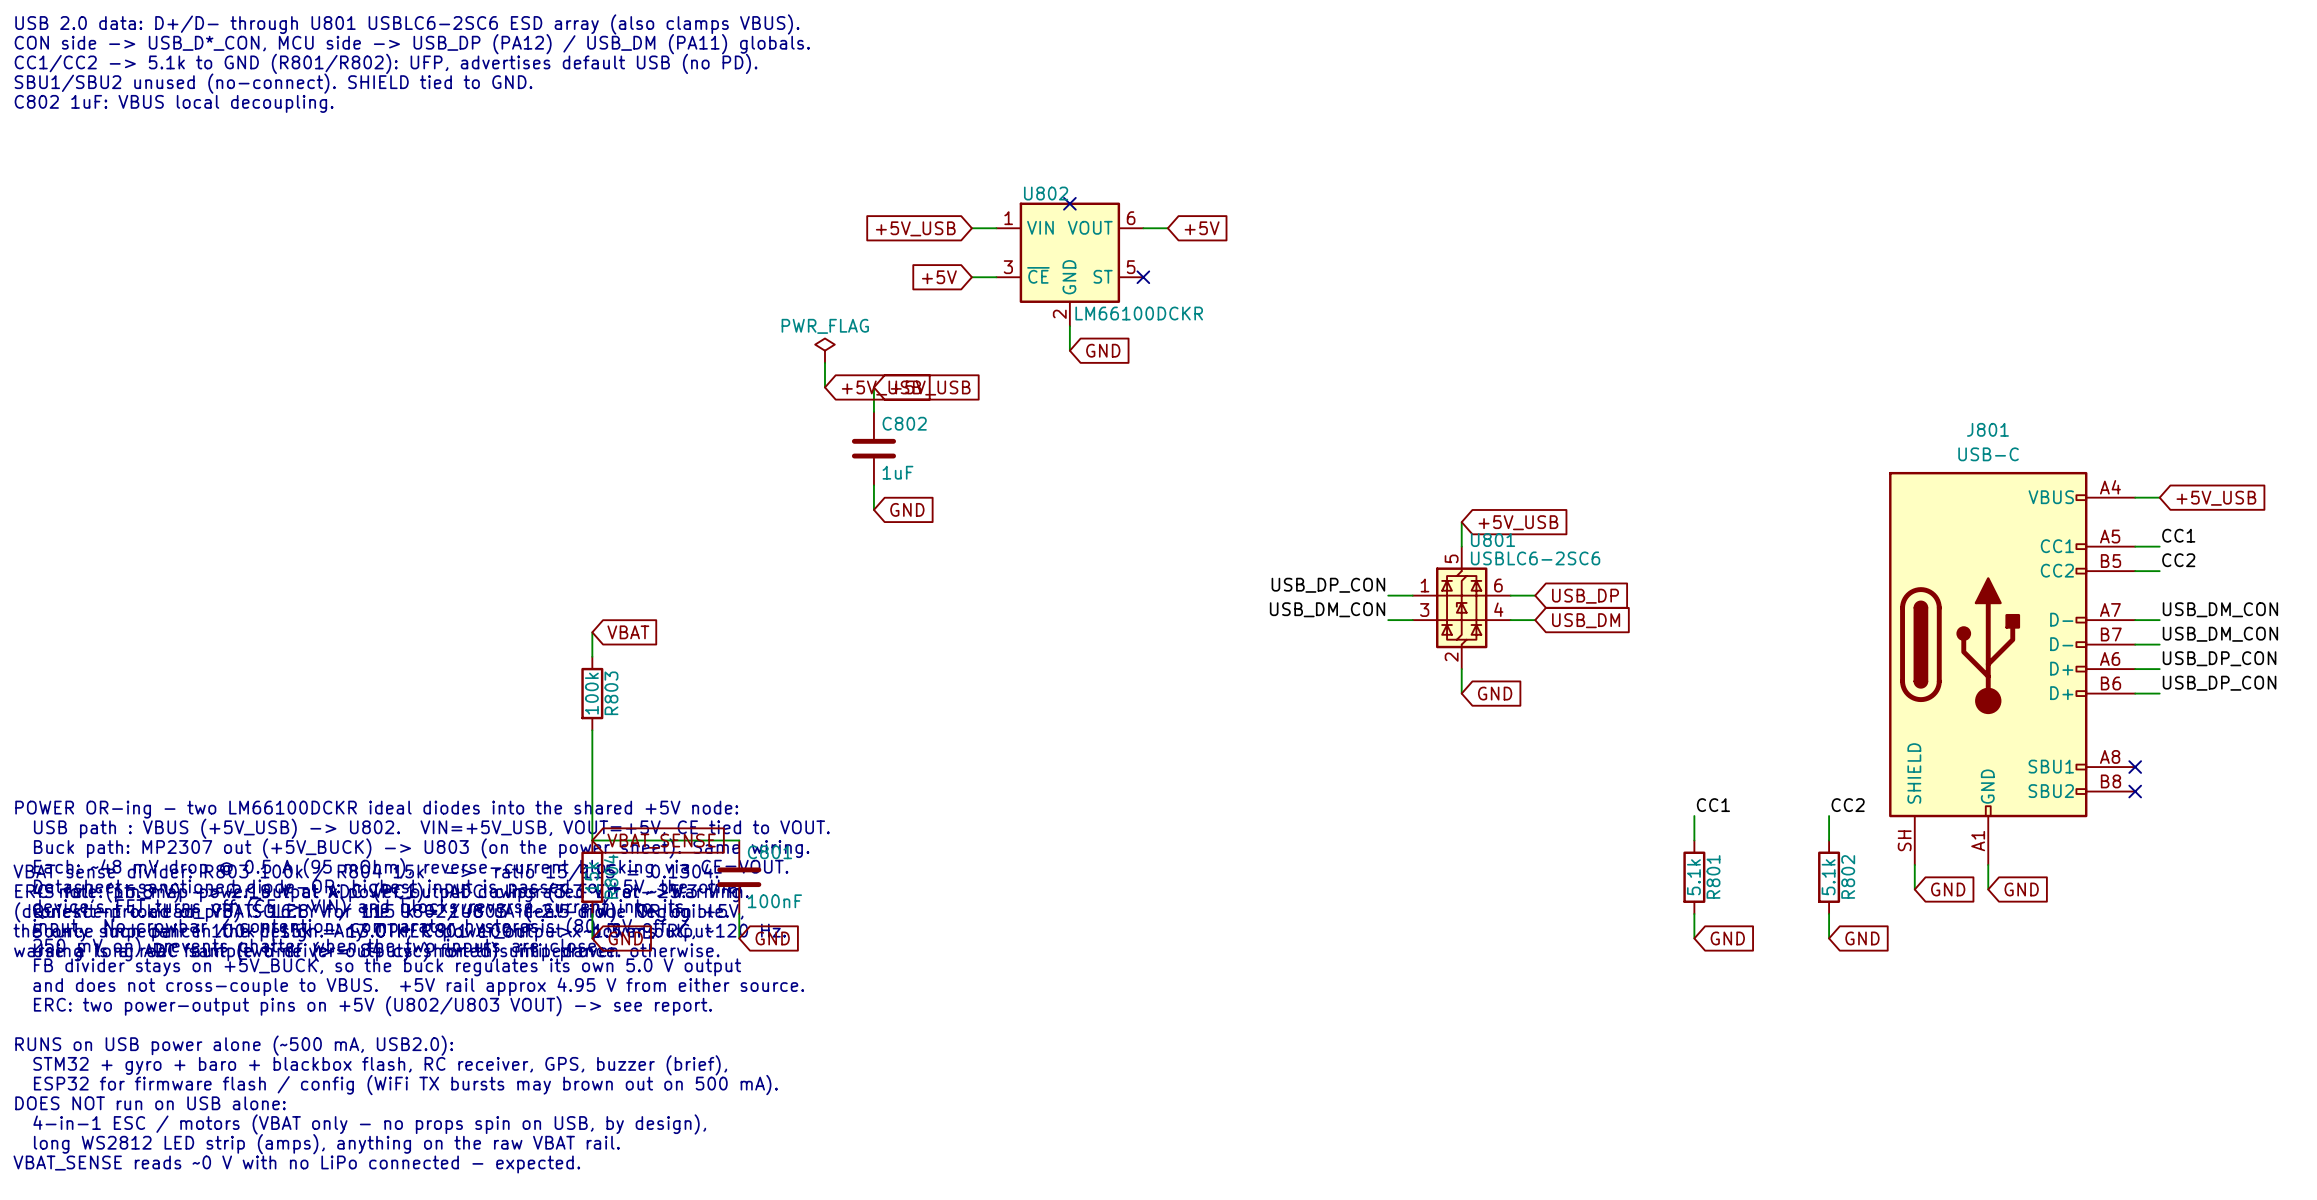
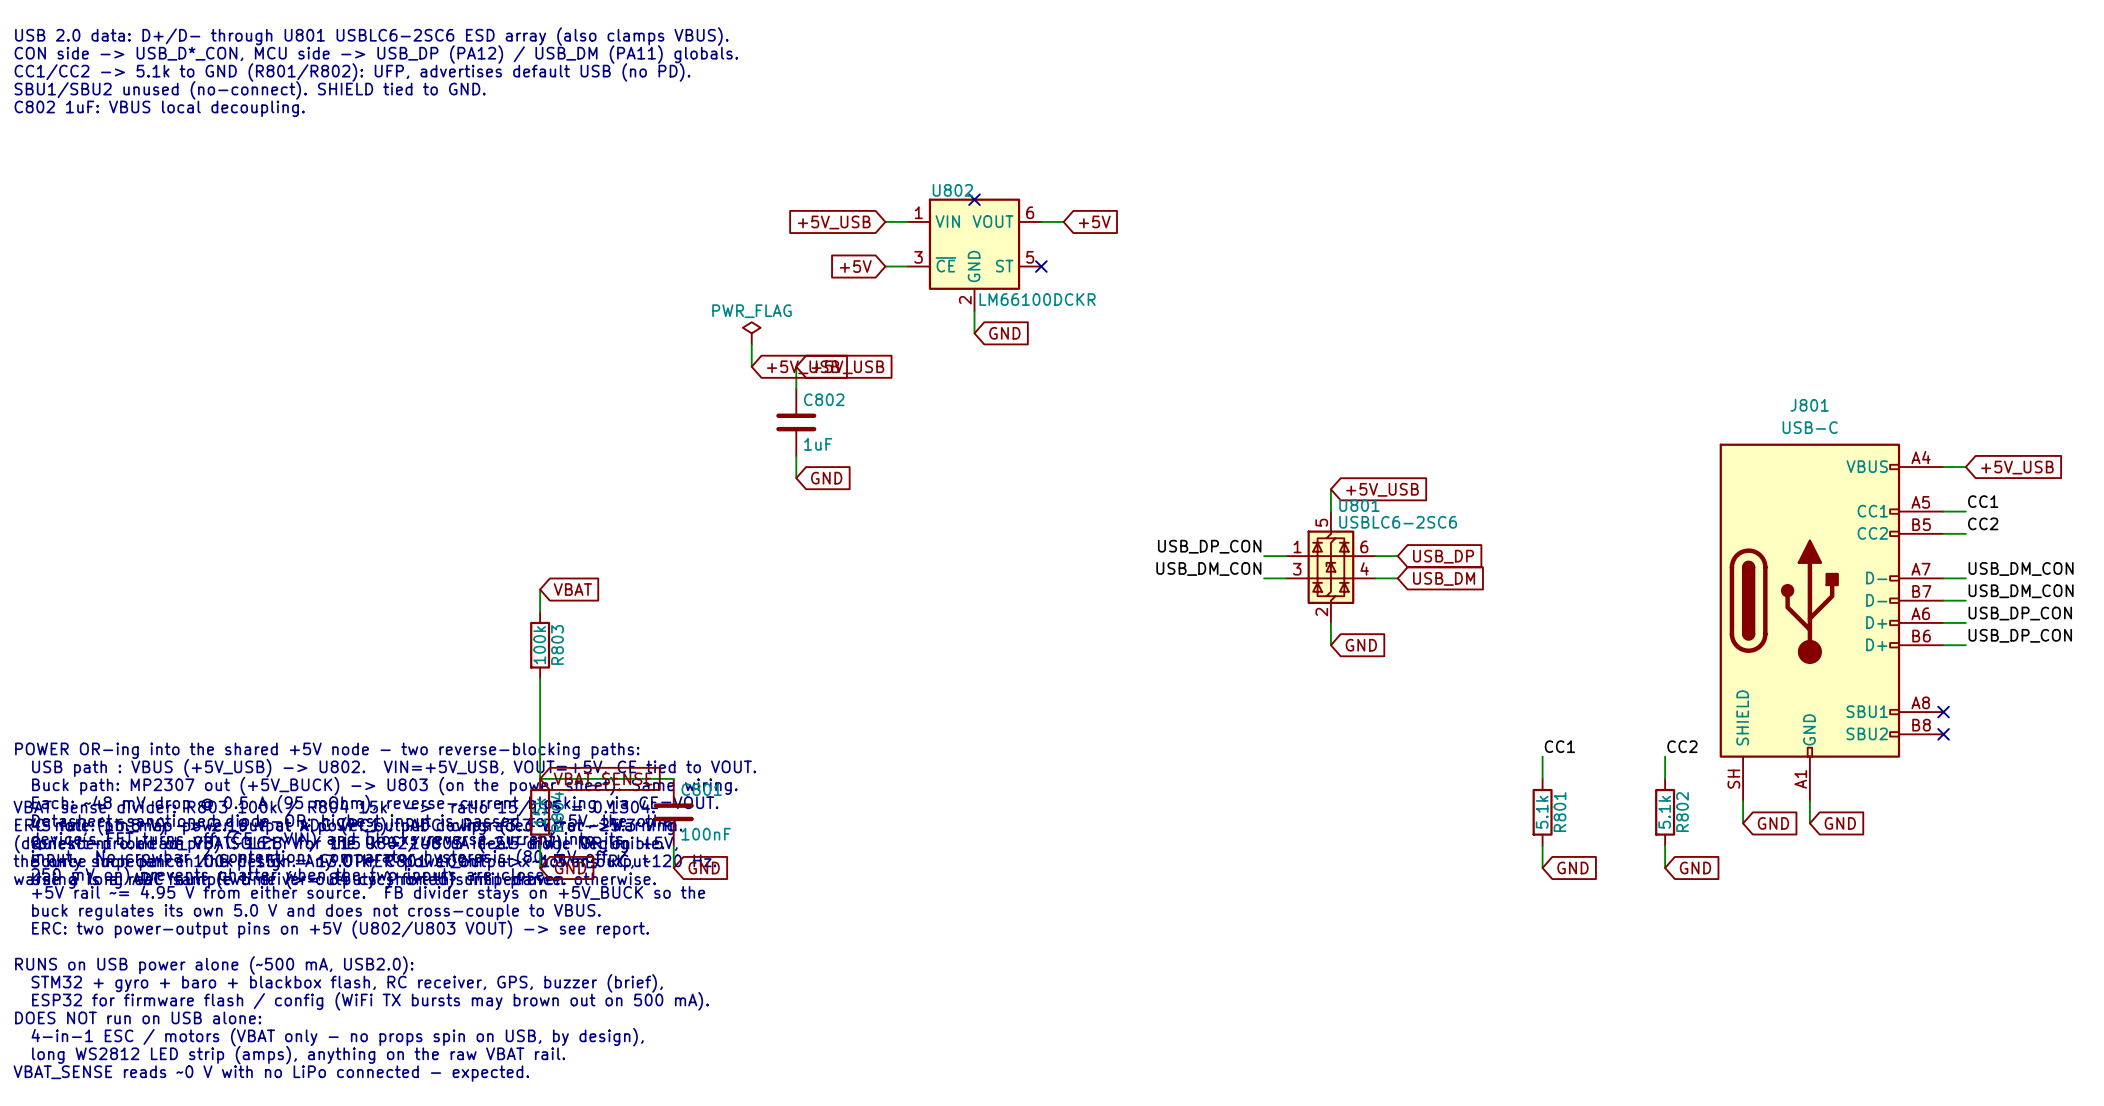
text: POWER OR-ing - two LM66100DCKR ideal diodes into the shared +5V node: (376, 809) -> POWER OR-ing into the shared +5V node - two reverse-blocking paths: (327, 750)
text: FB divider stays on +5V_BUCK, so the buck regulates its own 5.0 V output (387, 967) -> +5V rail ~= 4.95 V from either source. FB divider stays on +5V_BUCK so the (368, 894)
text: and does not cross-couple to VBUS. +5V rail approx 4.95 V from either source. (418, 986) -> buck regulates its own 5.0 V and does not cross-couple to VBUS. (316, 912)

